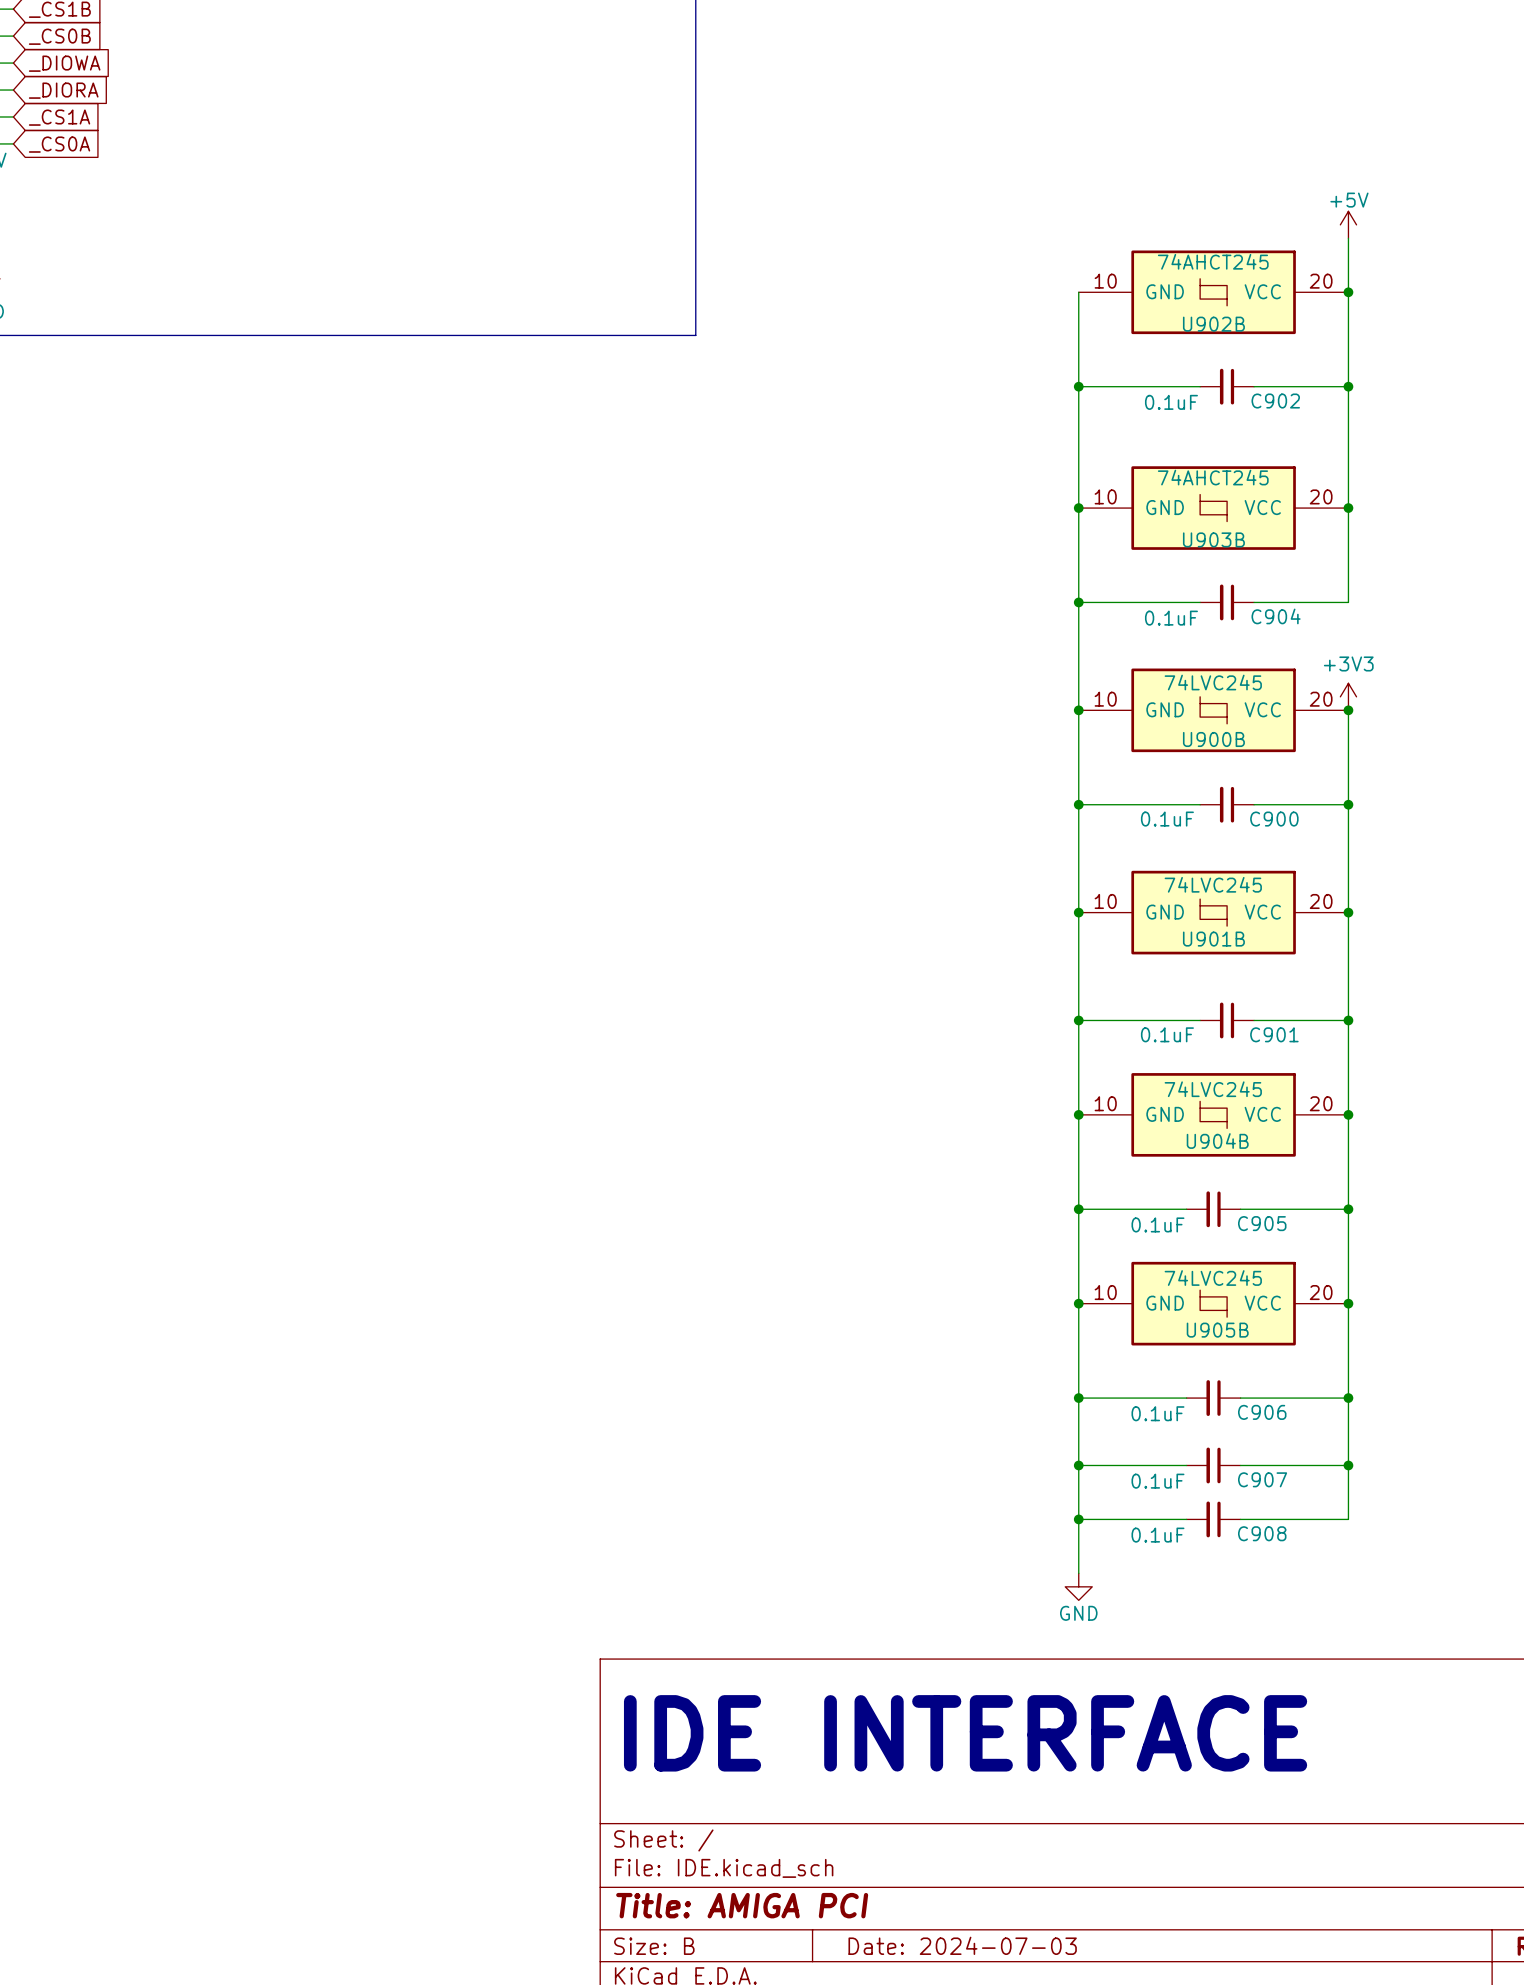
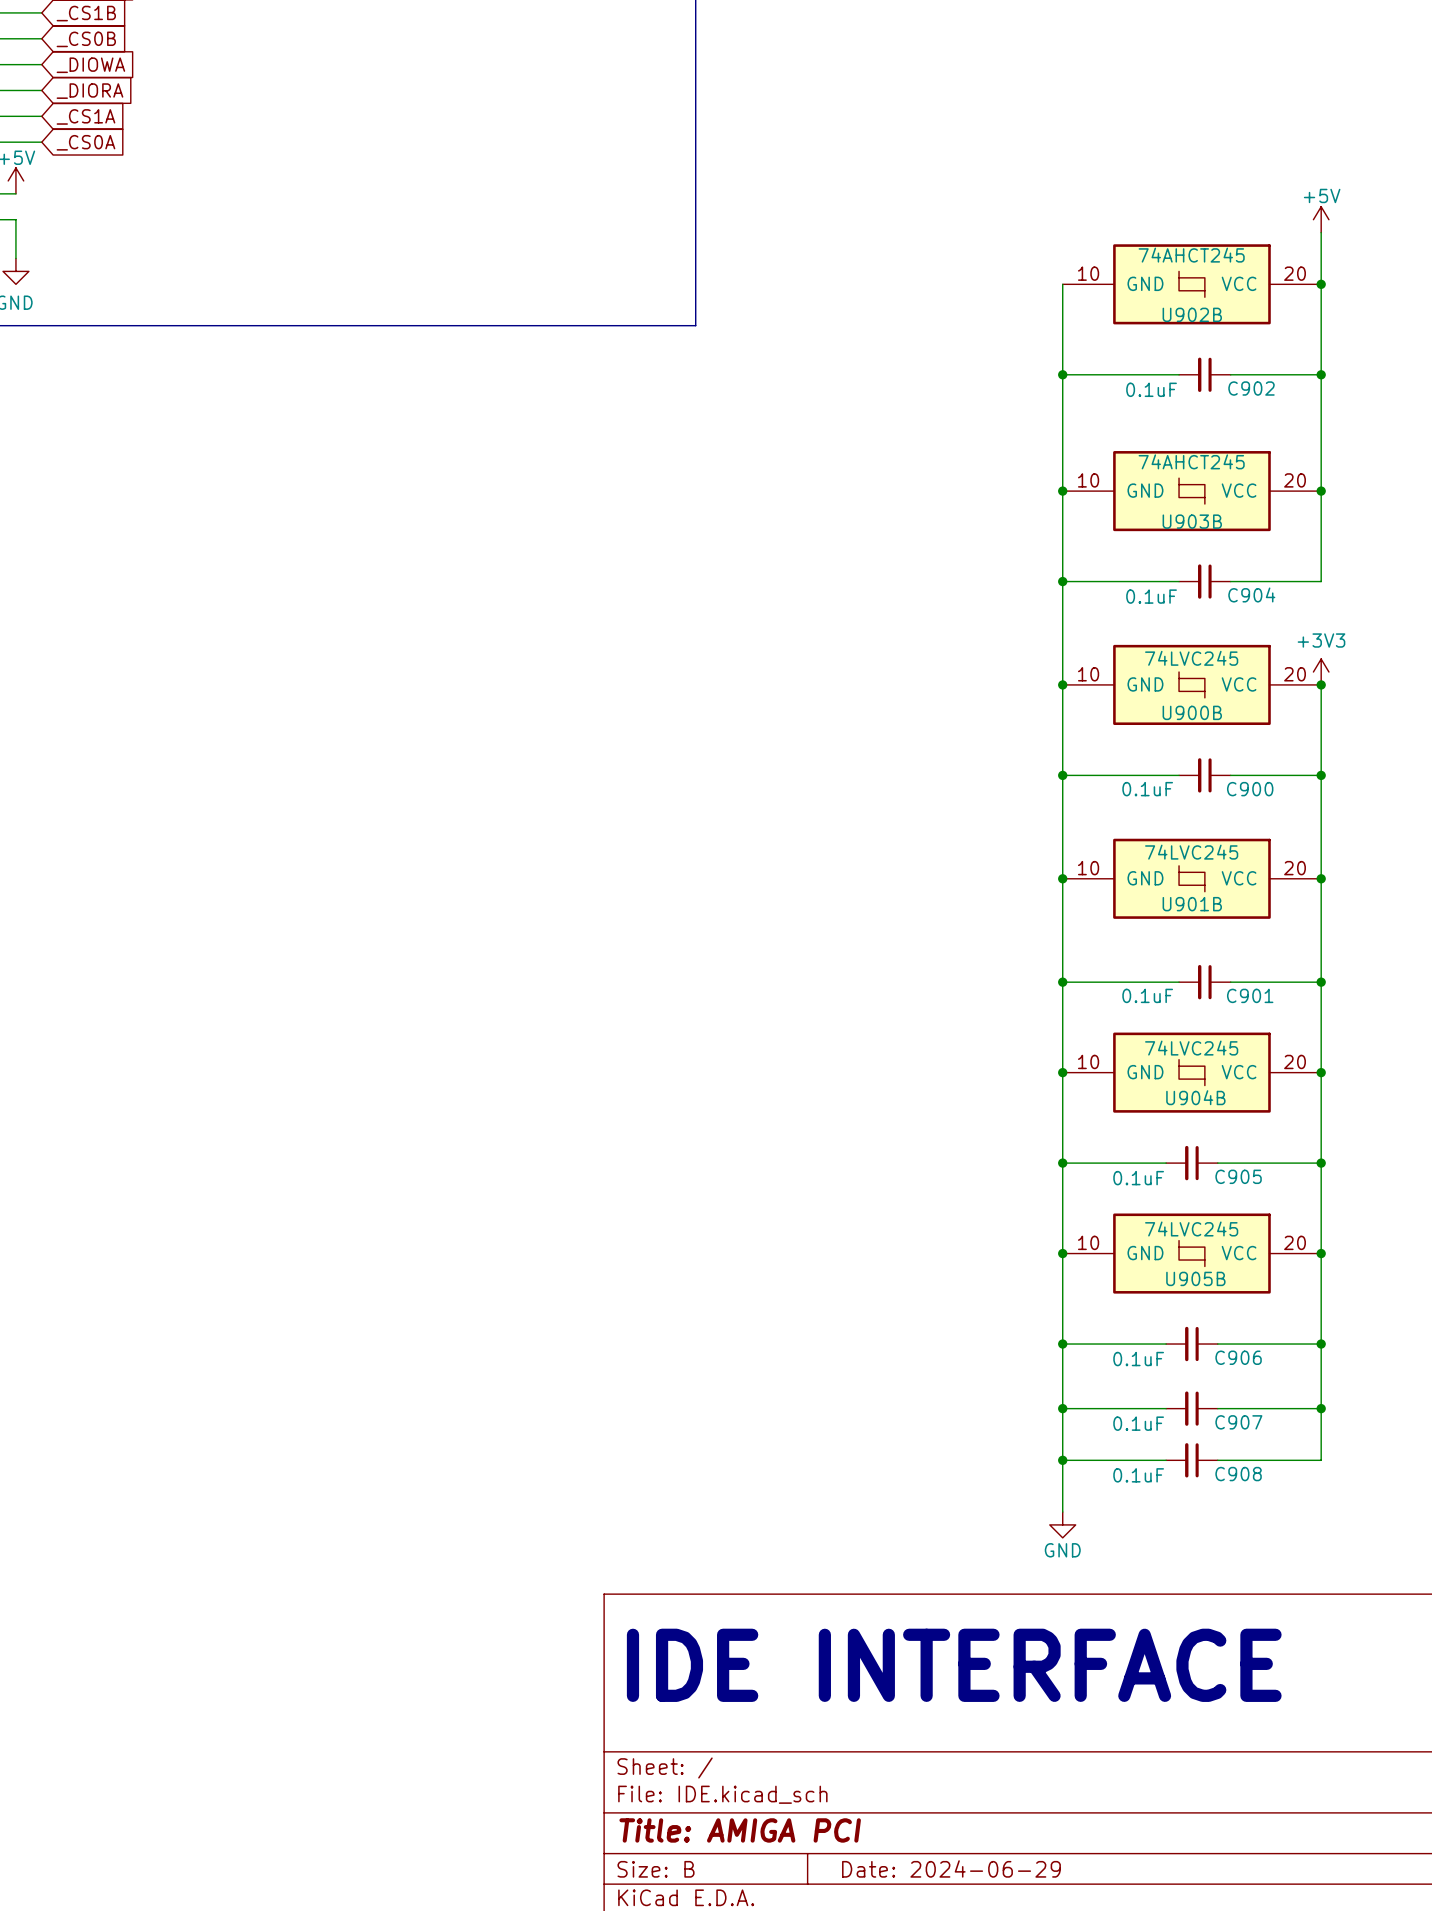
title block: Date: 2024-07-03 (962, 1945) -> Date: 2024-06-29 (951, 1868)

